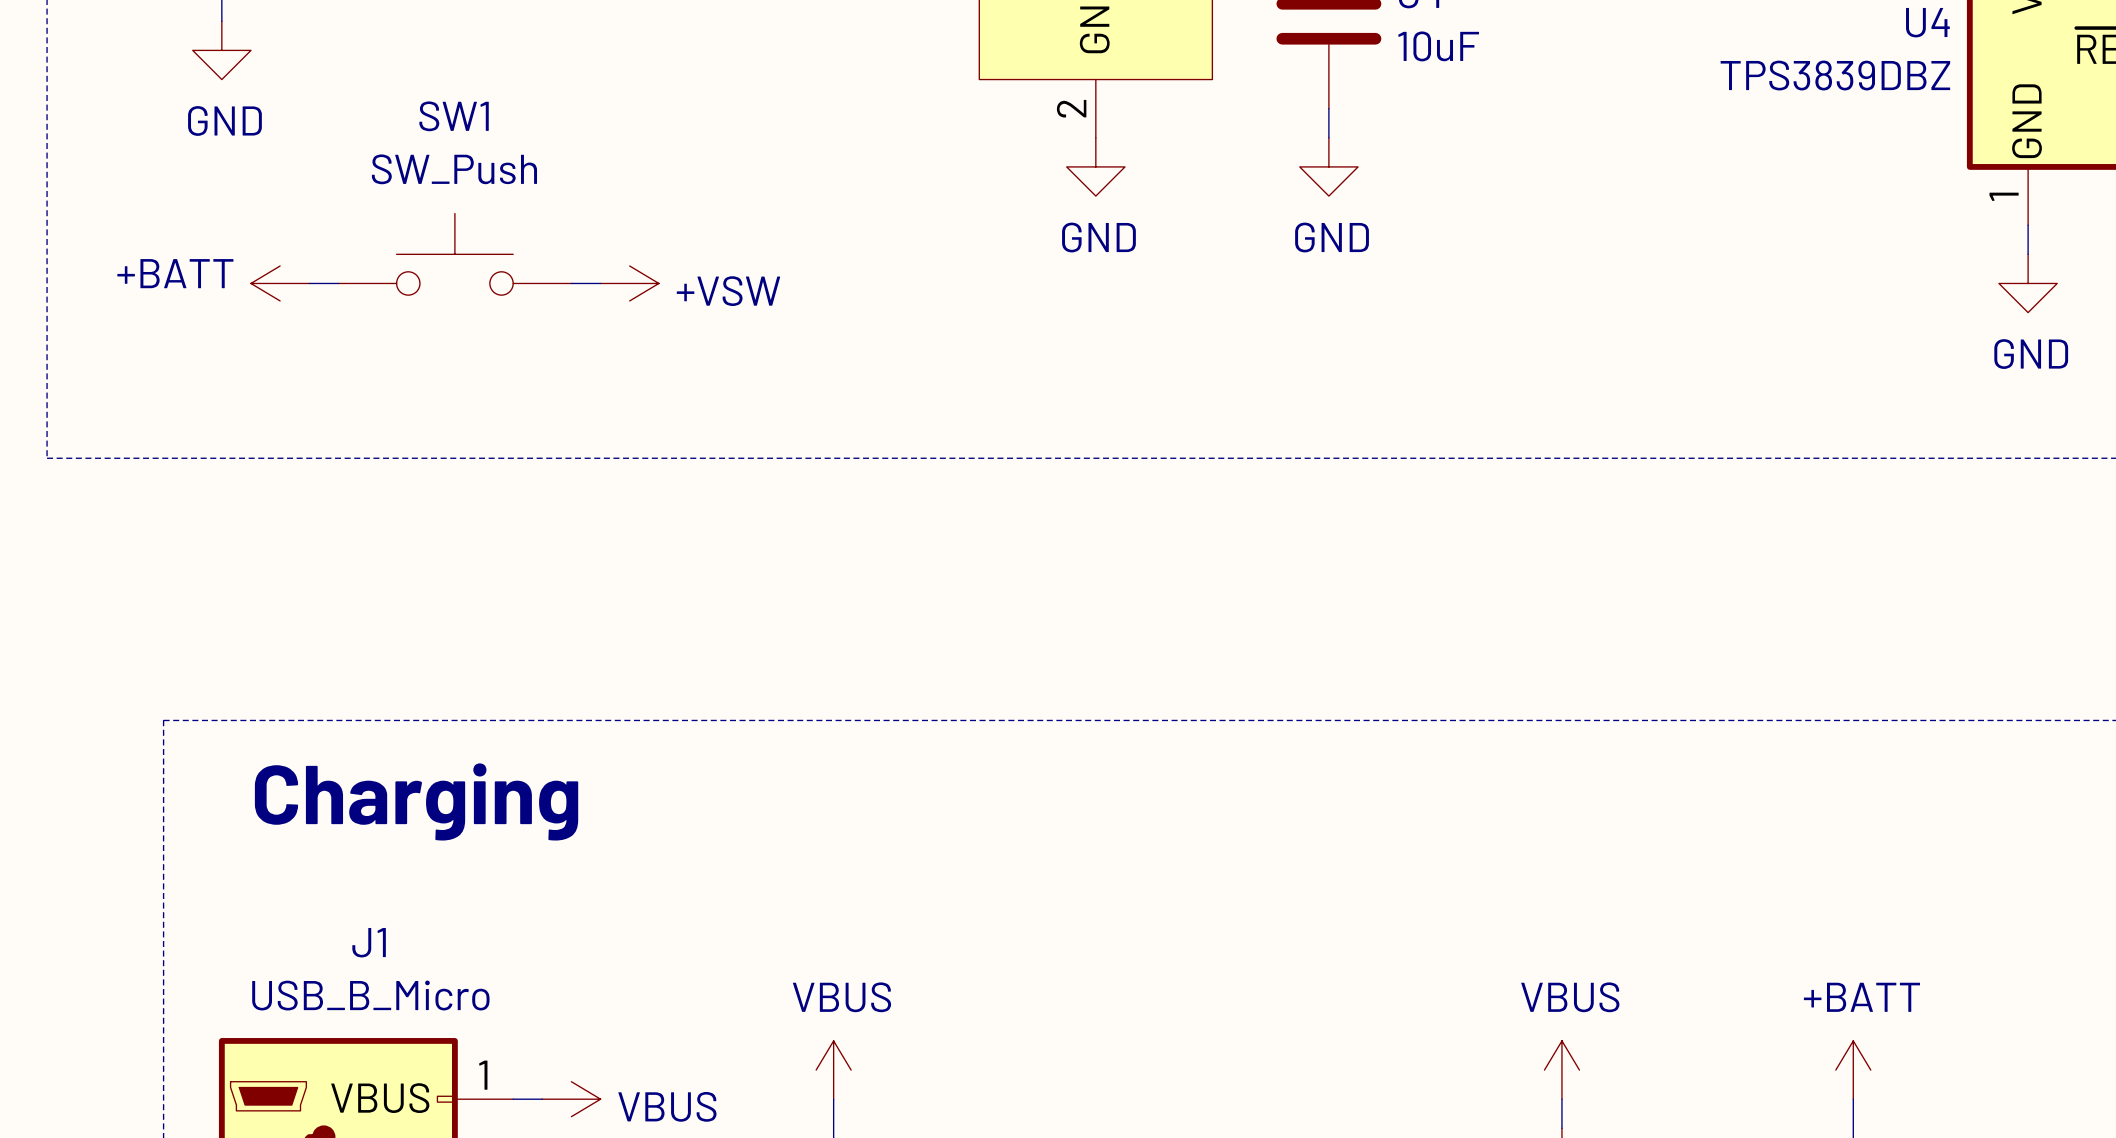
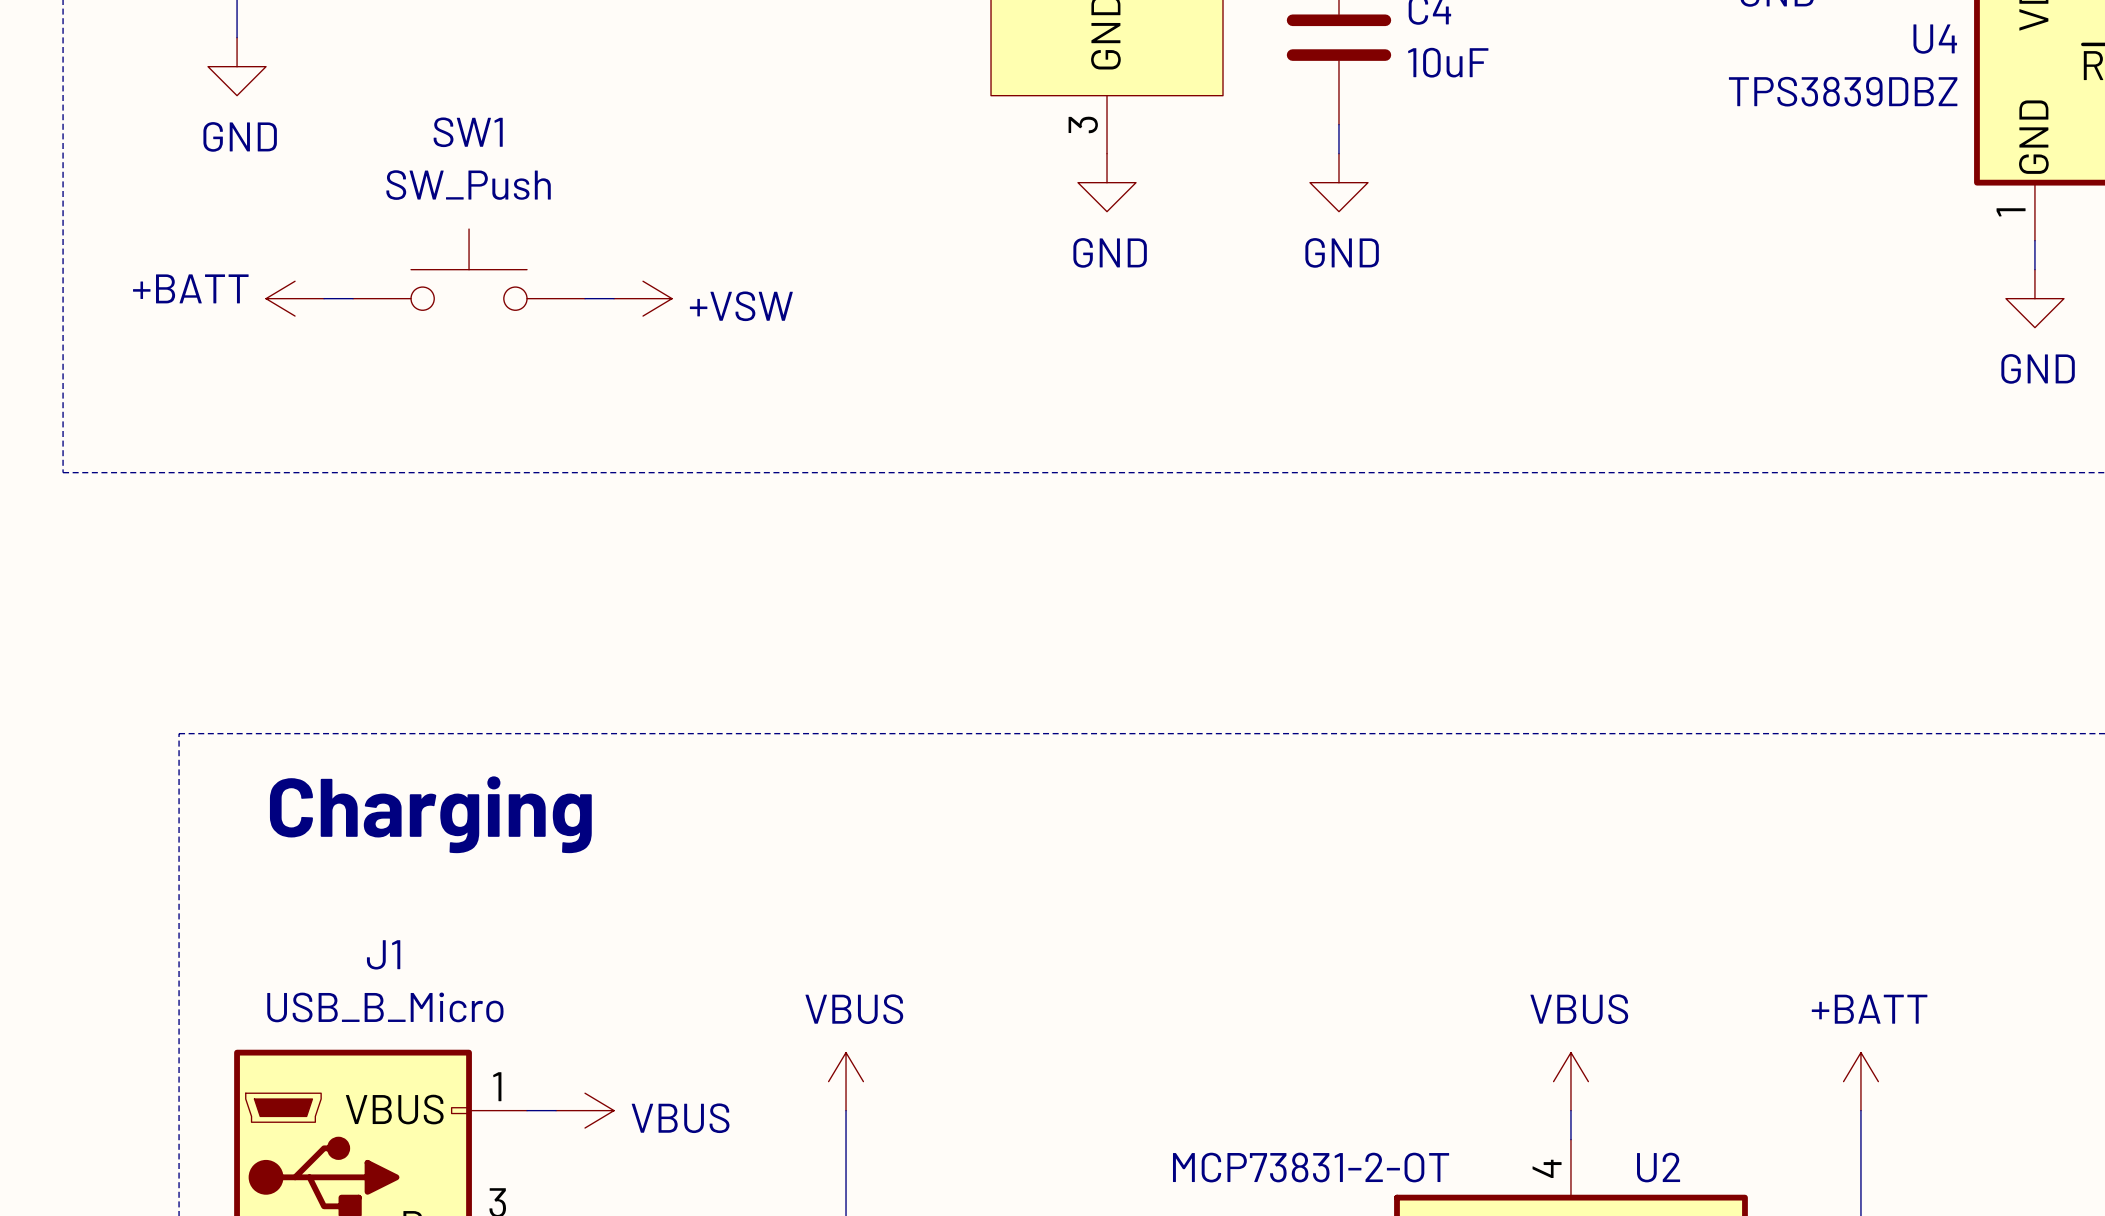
part pin number: 2 (1071, 108) -> 3 (1083, 124)

